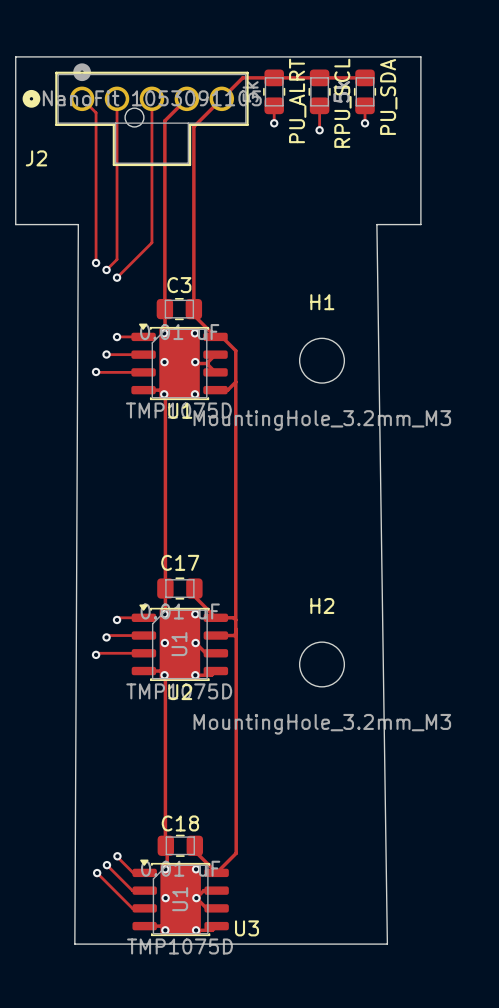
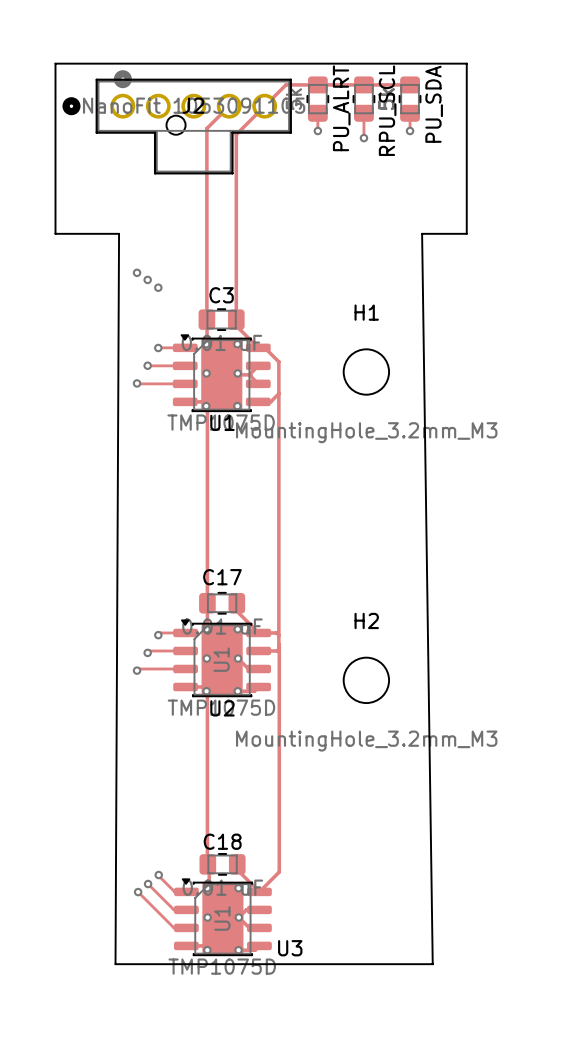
track: (82, 98) (96, 112) (96, 262) -> none
track: (117, 98) (117, 259) (106, 269) -> none
track: (151, 98) (151, 242) (117, 277) -> none
J2 name position: J2 (36, 158) -> J2 (193, 105)

